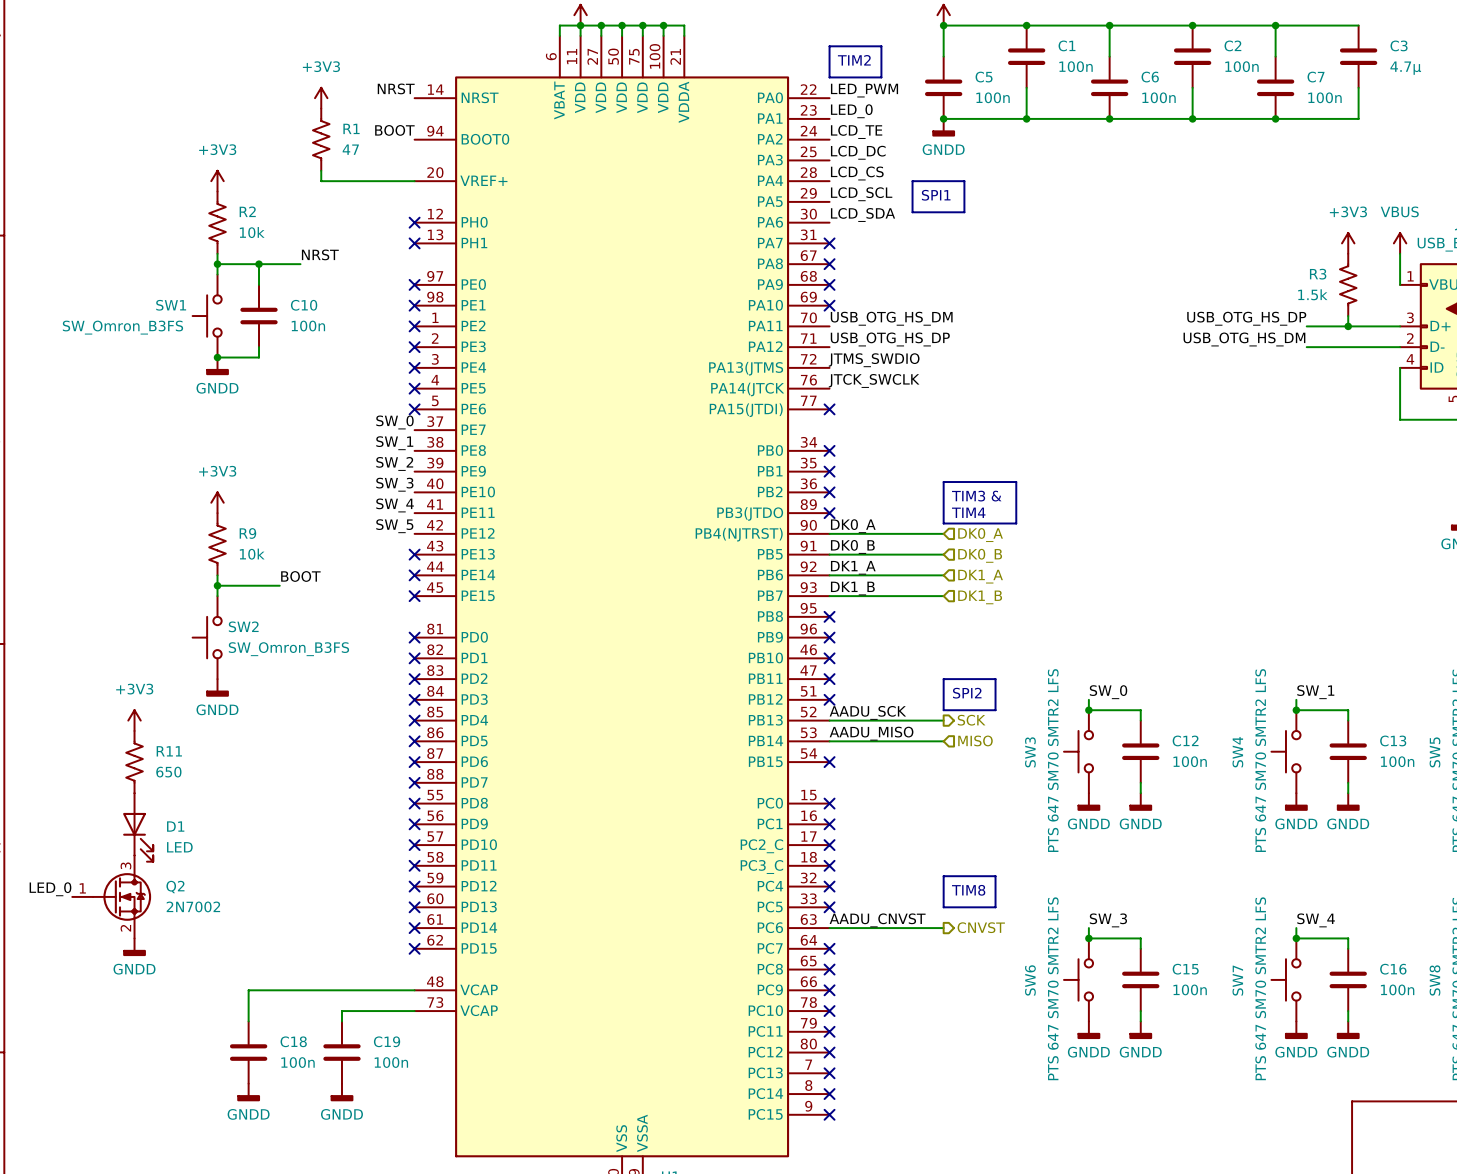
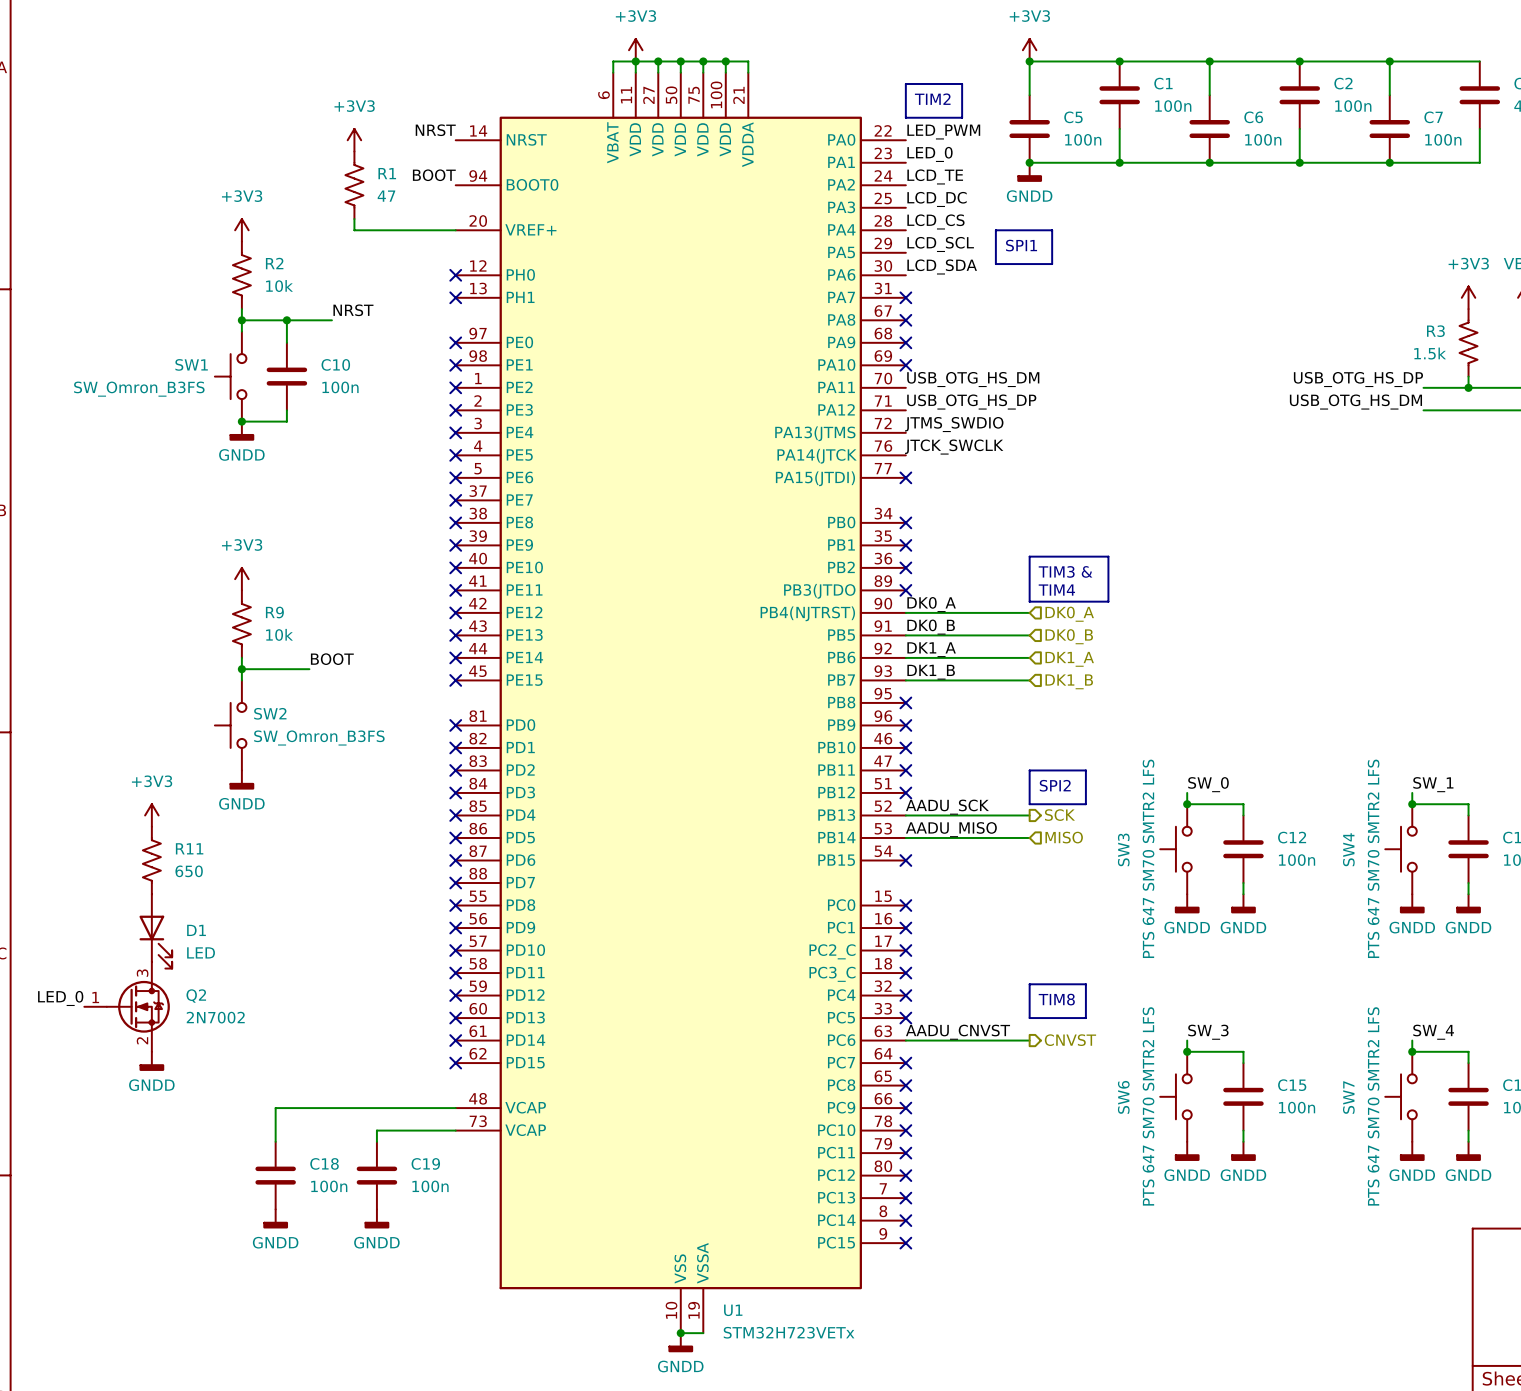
label: SW_0 (394, 422) -> none
no-connect mark: none -> (455, 500)
label: SW_1 (394, 443) -> none
no-connect mark: none -> (455, 522)
label: SW_2 (394, 463) -> none
no-connect mark: none -> (455, 545)
label: SW_3 (394, 484) -> none
no-connect mark: none -> (455, 567)
label: SW_4 (395, 505) -> none
no-connect mark: none -> (455, 590)
label: SW_5 (394, 526) -> none
no-connect mark: none -> (455, 612)

